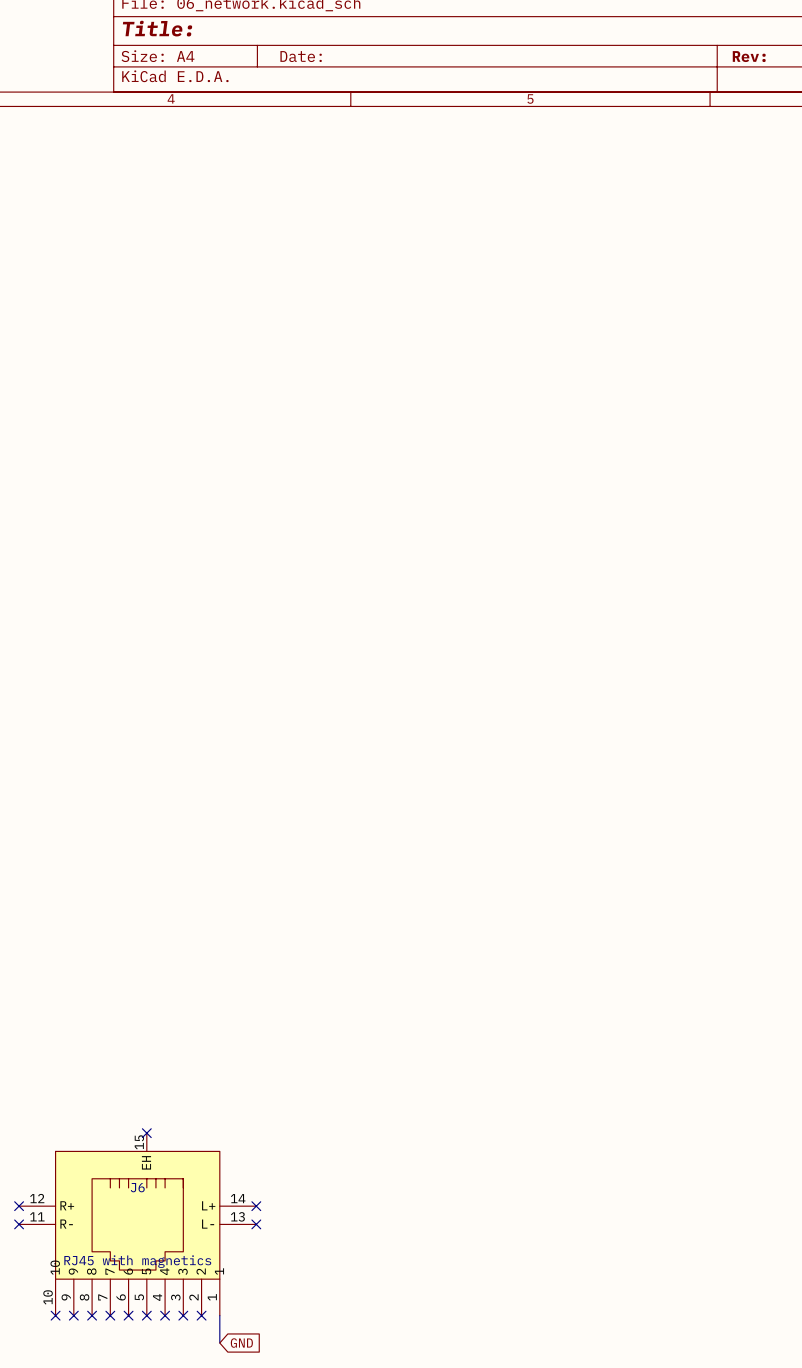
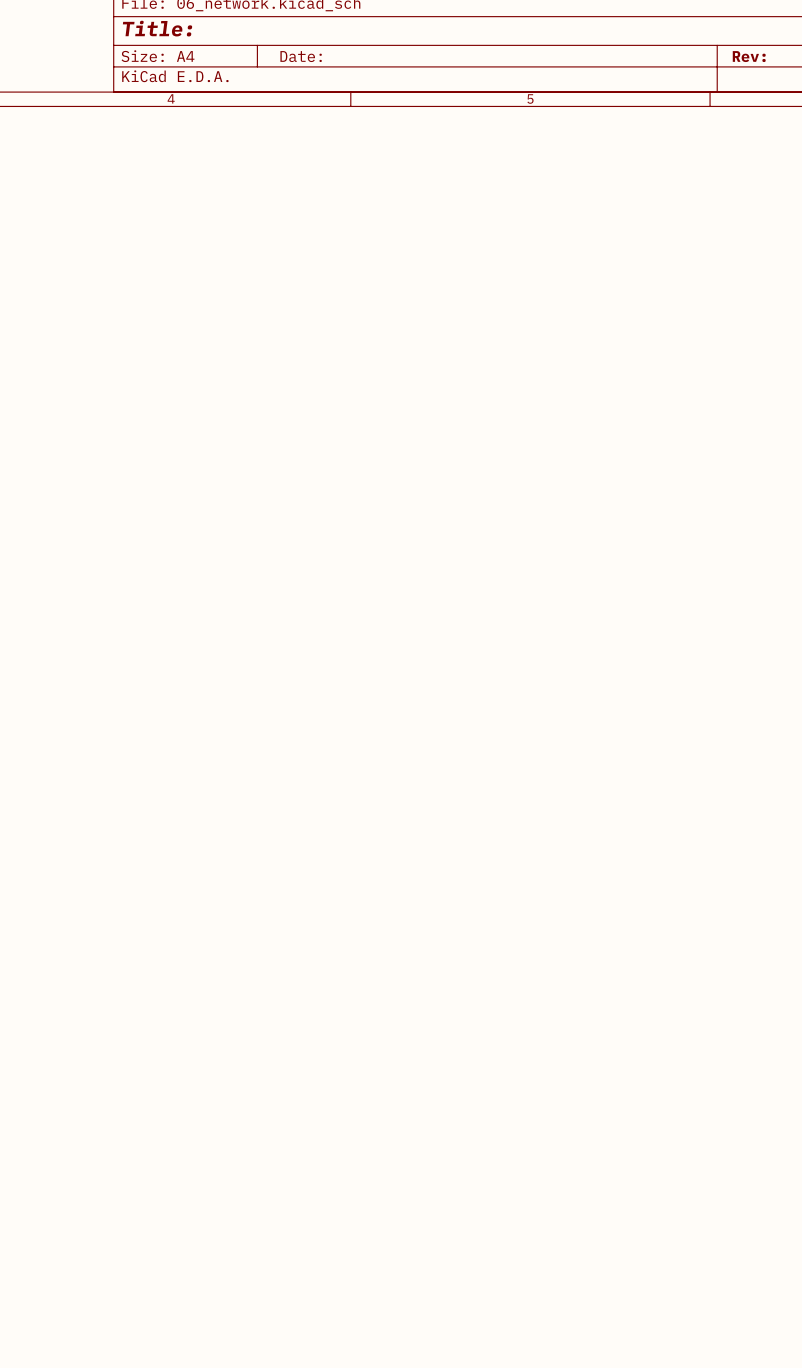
no-connect mark: (146, 1133) -> none
no-connect mark: (19, 1206) -> none
no-connect mark: (256, 1206) -> none
no-connect mark: (19, 1224) -> none
J6: RJ45 with magnetics (137, 1224) -> none
no-connect mark: (256, 1224) -> none
no-connect mark: (55, 1315) -> none
no-connect mark: (73, 1315) -> none
no-connect mark: (92, 1315) -> none
no-connect mark: (110, 1315) -> none
no-connect mark: (128, 1315) -> none
no-connect mark: (146, 1315) -> none
no-connect mark: (165, 1315) -> none
no-connect mark: (183, 1315) -> none
no-connect mark: (201, 1315) -> none
wire: (219, 1315) (219, 1343) -> none
global label: GND (241, 1343) -> none

